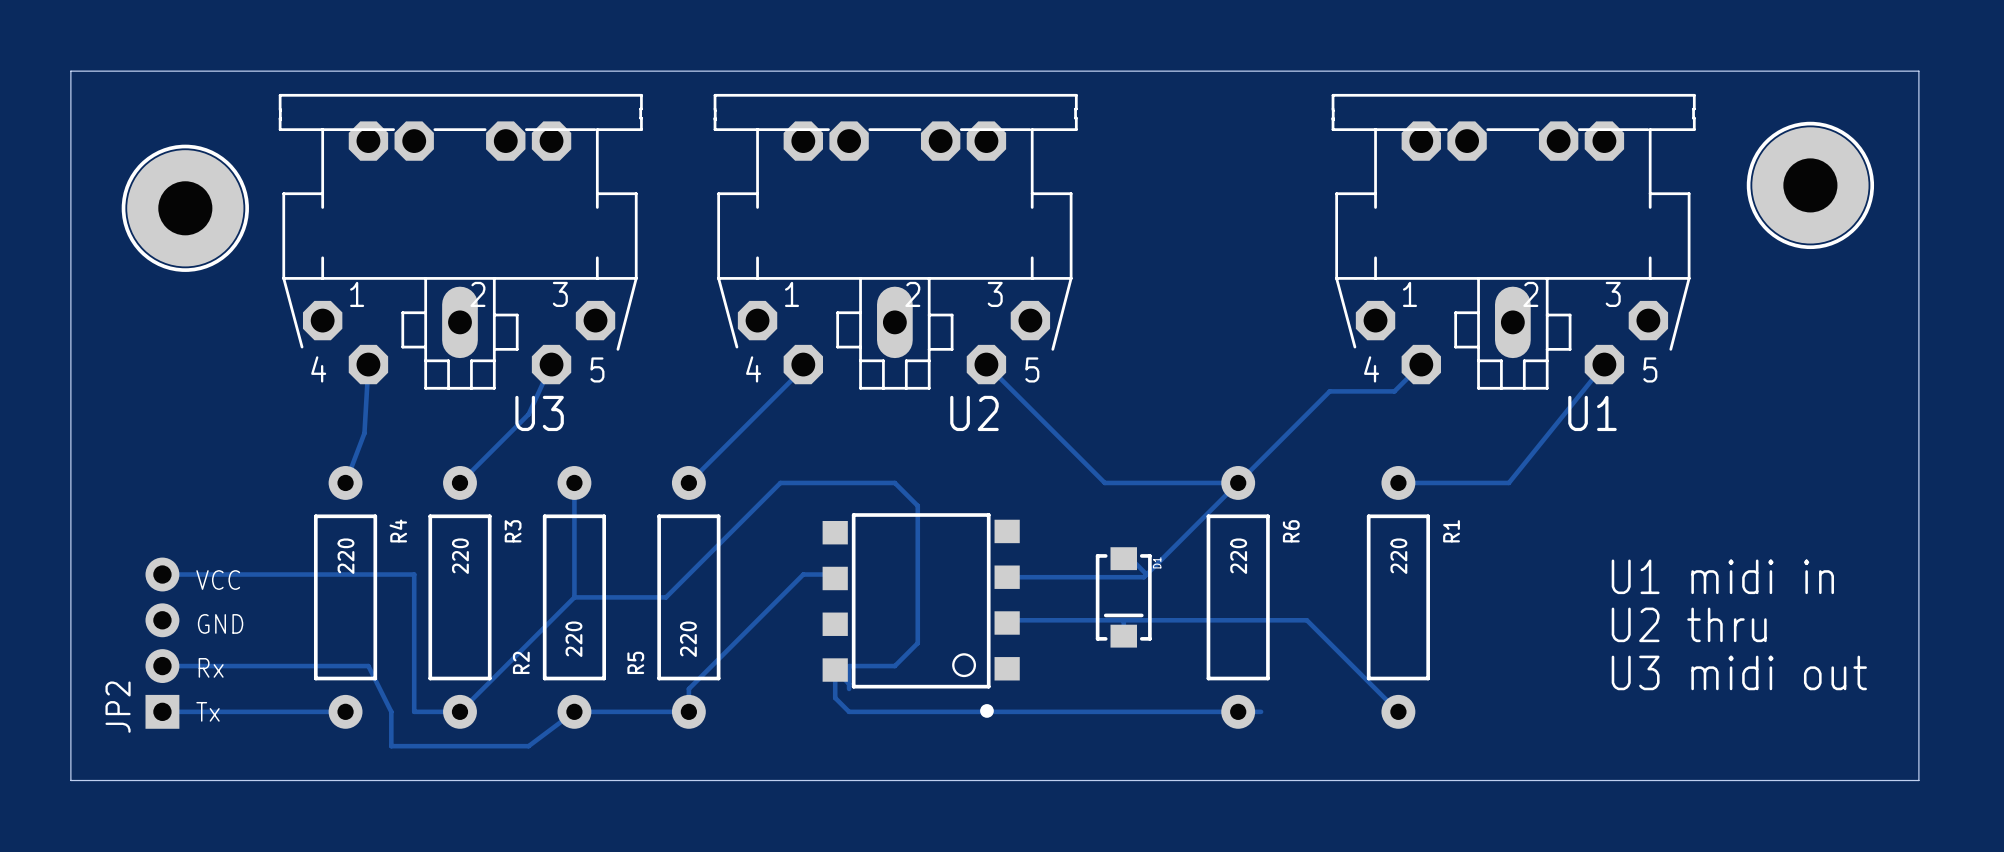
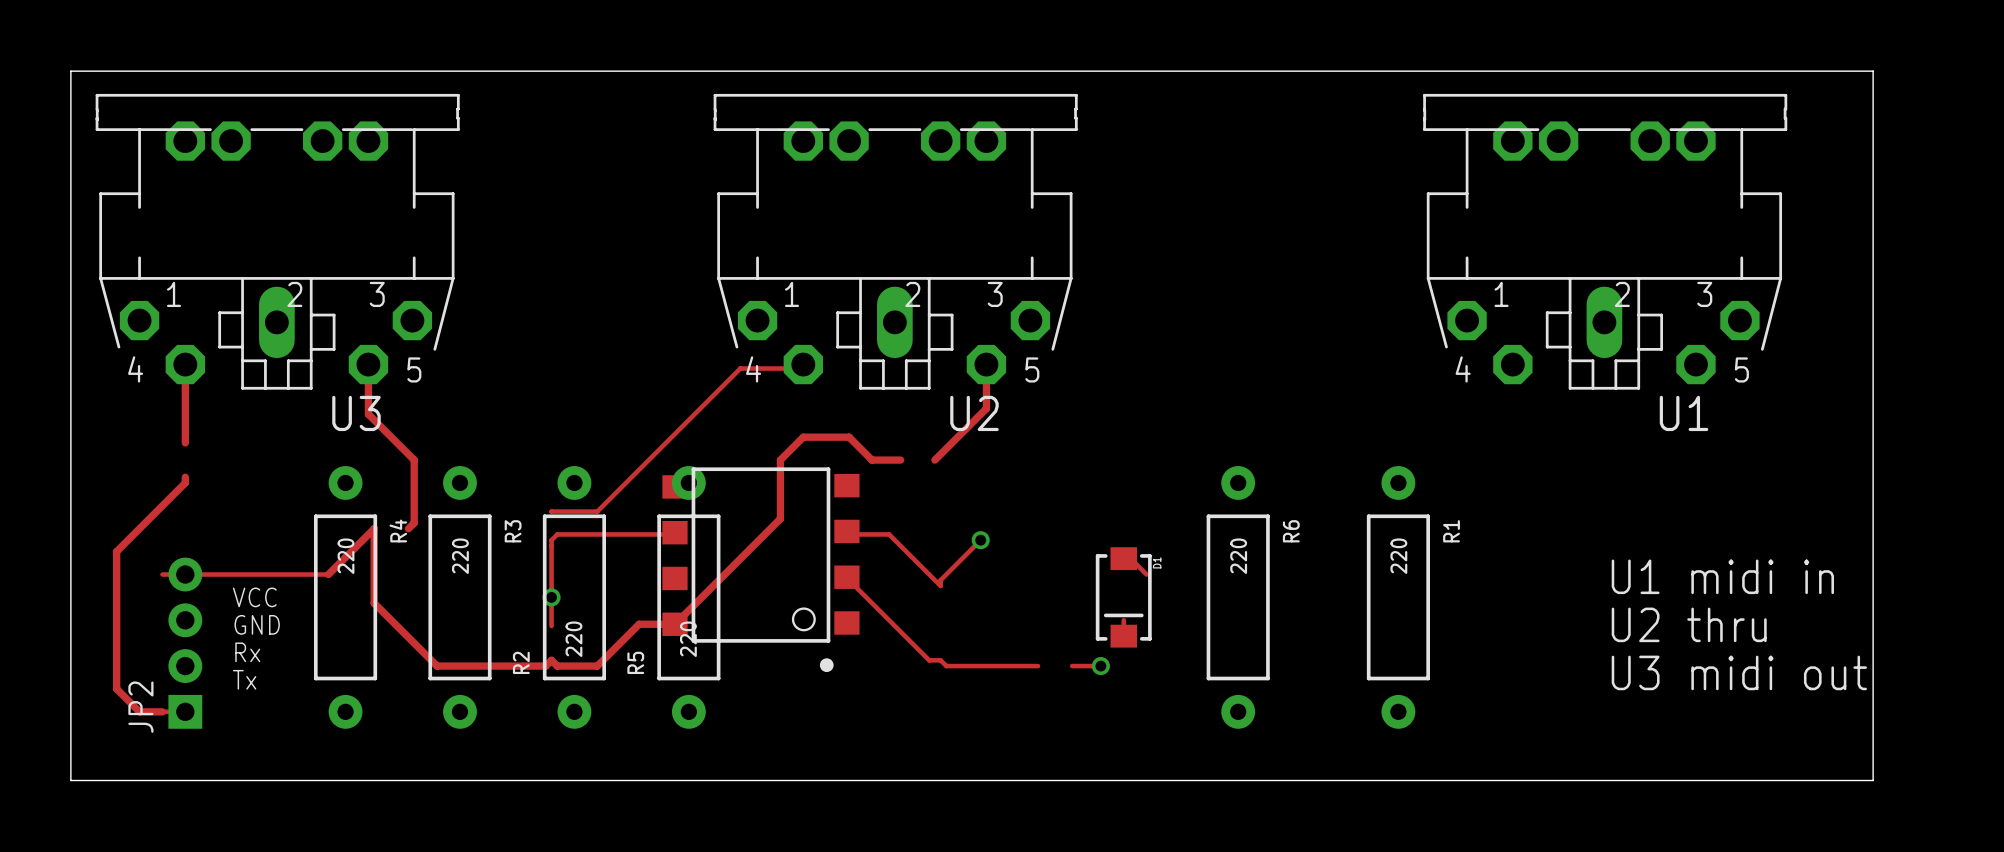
board edge: (1873, 71) (1918, 71) (1918, 780) (1873, 780) -> (1873, 71) (1873, 780)
part: (1810, 185) -> none
part: (185, 208) -> none
U3 position: (460, 241) -> (277, 241)
U1 position: (1513, 241) -> (1605, 241)
track: none -> (185, 364) (185, 442)
track: (368, 364) (364, 433) (345, 482) -> (368, 364) (368, 414) (414, 460) (414, 522) (408, 528)
track: (551, 364) (528, 414) (459, 482) -> none
track: (986, 364) (1104, 482) (1238, 482) -> (986, 364) (986, 408) (934, 460)
track: (1421, 364) (1394, 391) (1329, 391) (1143, 577) (1007, 577) -> none
track: (1604, 364) (1508, 482) (1398, 482) -> none
track: (803, 368) (688, 482) -> (803, 368) (740, 368) (597, 511) (551, 511)
track: none -> (185, 477) (185, 482) (116, 551) (116, 688) (139, 711) (162, 711)
track: (574, 482) (574, 597) -> none
track: none -> (846, 531) (849, 534) (889, 534) (940, 585) (940, 580) (980, 540)
track: none -> (675, 532) (671, 534) (557, 534) (551, 540) (551, 626)
via: none -> (980, 540)
track: (328, 574) (414, 574) (414, 711) (459, 711) (574, 597) -> (328, 574) (374, 528) (374, 603) (437, 666) (545, 666) (551, 660) (557, 666) (597, 666) (639, 624) (675, 624) (780, 518) (780, 460) (803, 437) (849, 437) (871, 460) (900, 460)
track: none -> (846, 577) (929, 660) (940, 660) (946, 666) (1037, 666)
track: (835, 578) (831, 574) (803, 574) (688, 688) (688, 711) (574, 711) (528, 746) (391, 746) (391, 711) (368, 666) (162, 666) -> none
text position: VCC (218, 580) -> VCC (254, 597)
via: none -> (551, 597)
track: (574, 597) (665, 597) (780, 482) (894, 482) (917, 505) (917, 643) (894, 666) (849, 666) (849, 688) -> none
part position: (921, 615) -> (760, 569)
track: (1007, 622) (1009, 620) (1306, 620) (1398, 711) -> none
text position: GND (220, 623) -> GND (257, 624)
JP2 position: (162, 643) -> (185, 643)
track: none -> (1072, 666) (1100, 666)
via: none -> (1100, 666)
text position: Rx (211, 667) -> Rx (247, 652)
track: (849, 683) (835, 670) (835, 697) (849, 711) (1261, 711) -> none
track: (185, 711) (345, 711) -> none
text position: Tx (208, 711) -> Tx (244, 679)

